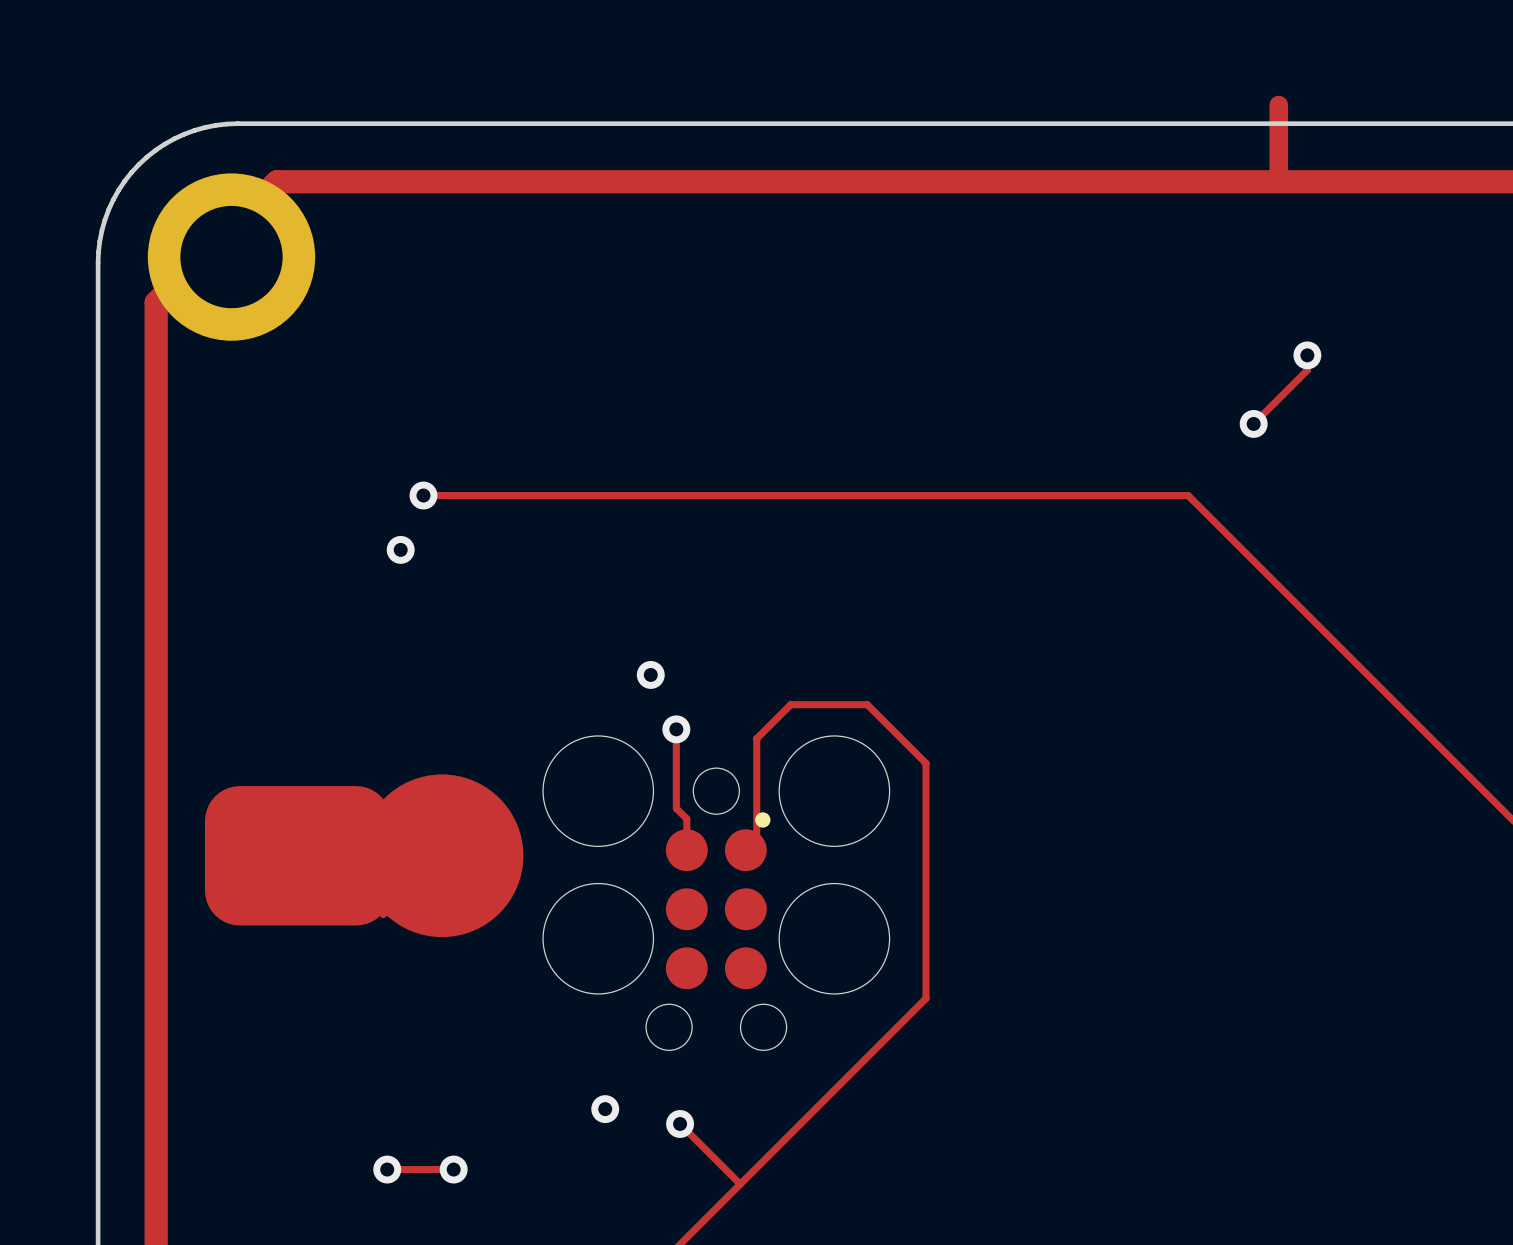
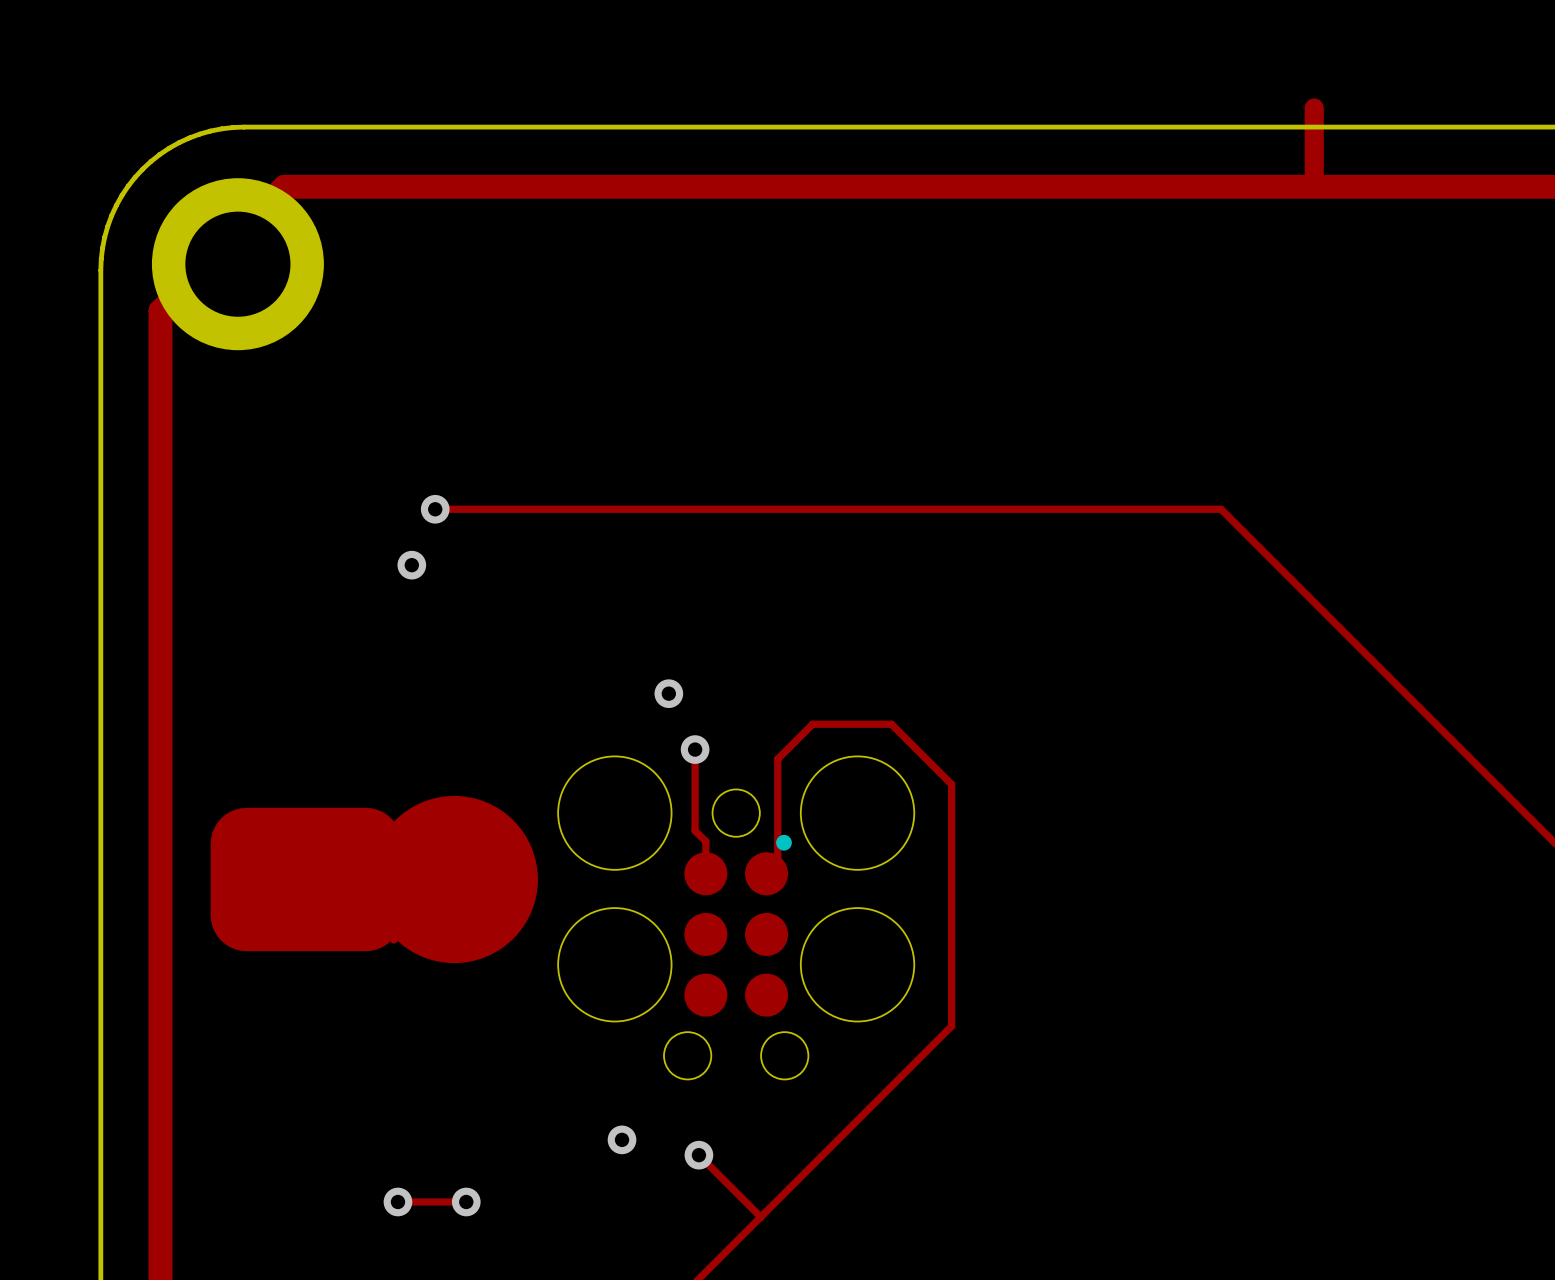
track: (1307, 355) (1307, 370) (1253, 423) -> none
via: (1307, 355) -> none
via: (1253, 423) -> none

